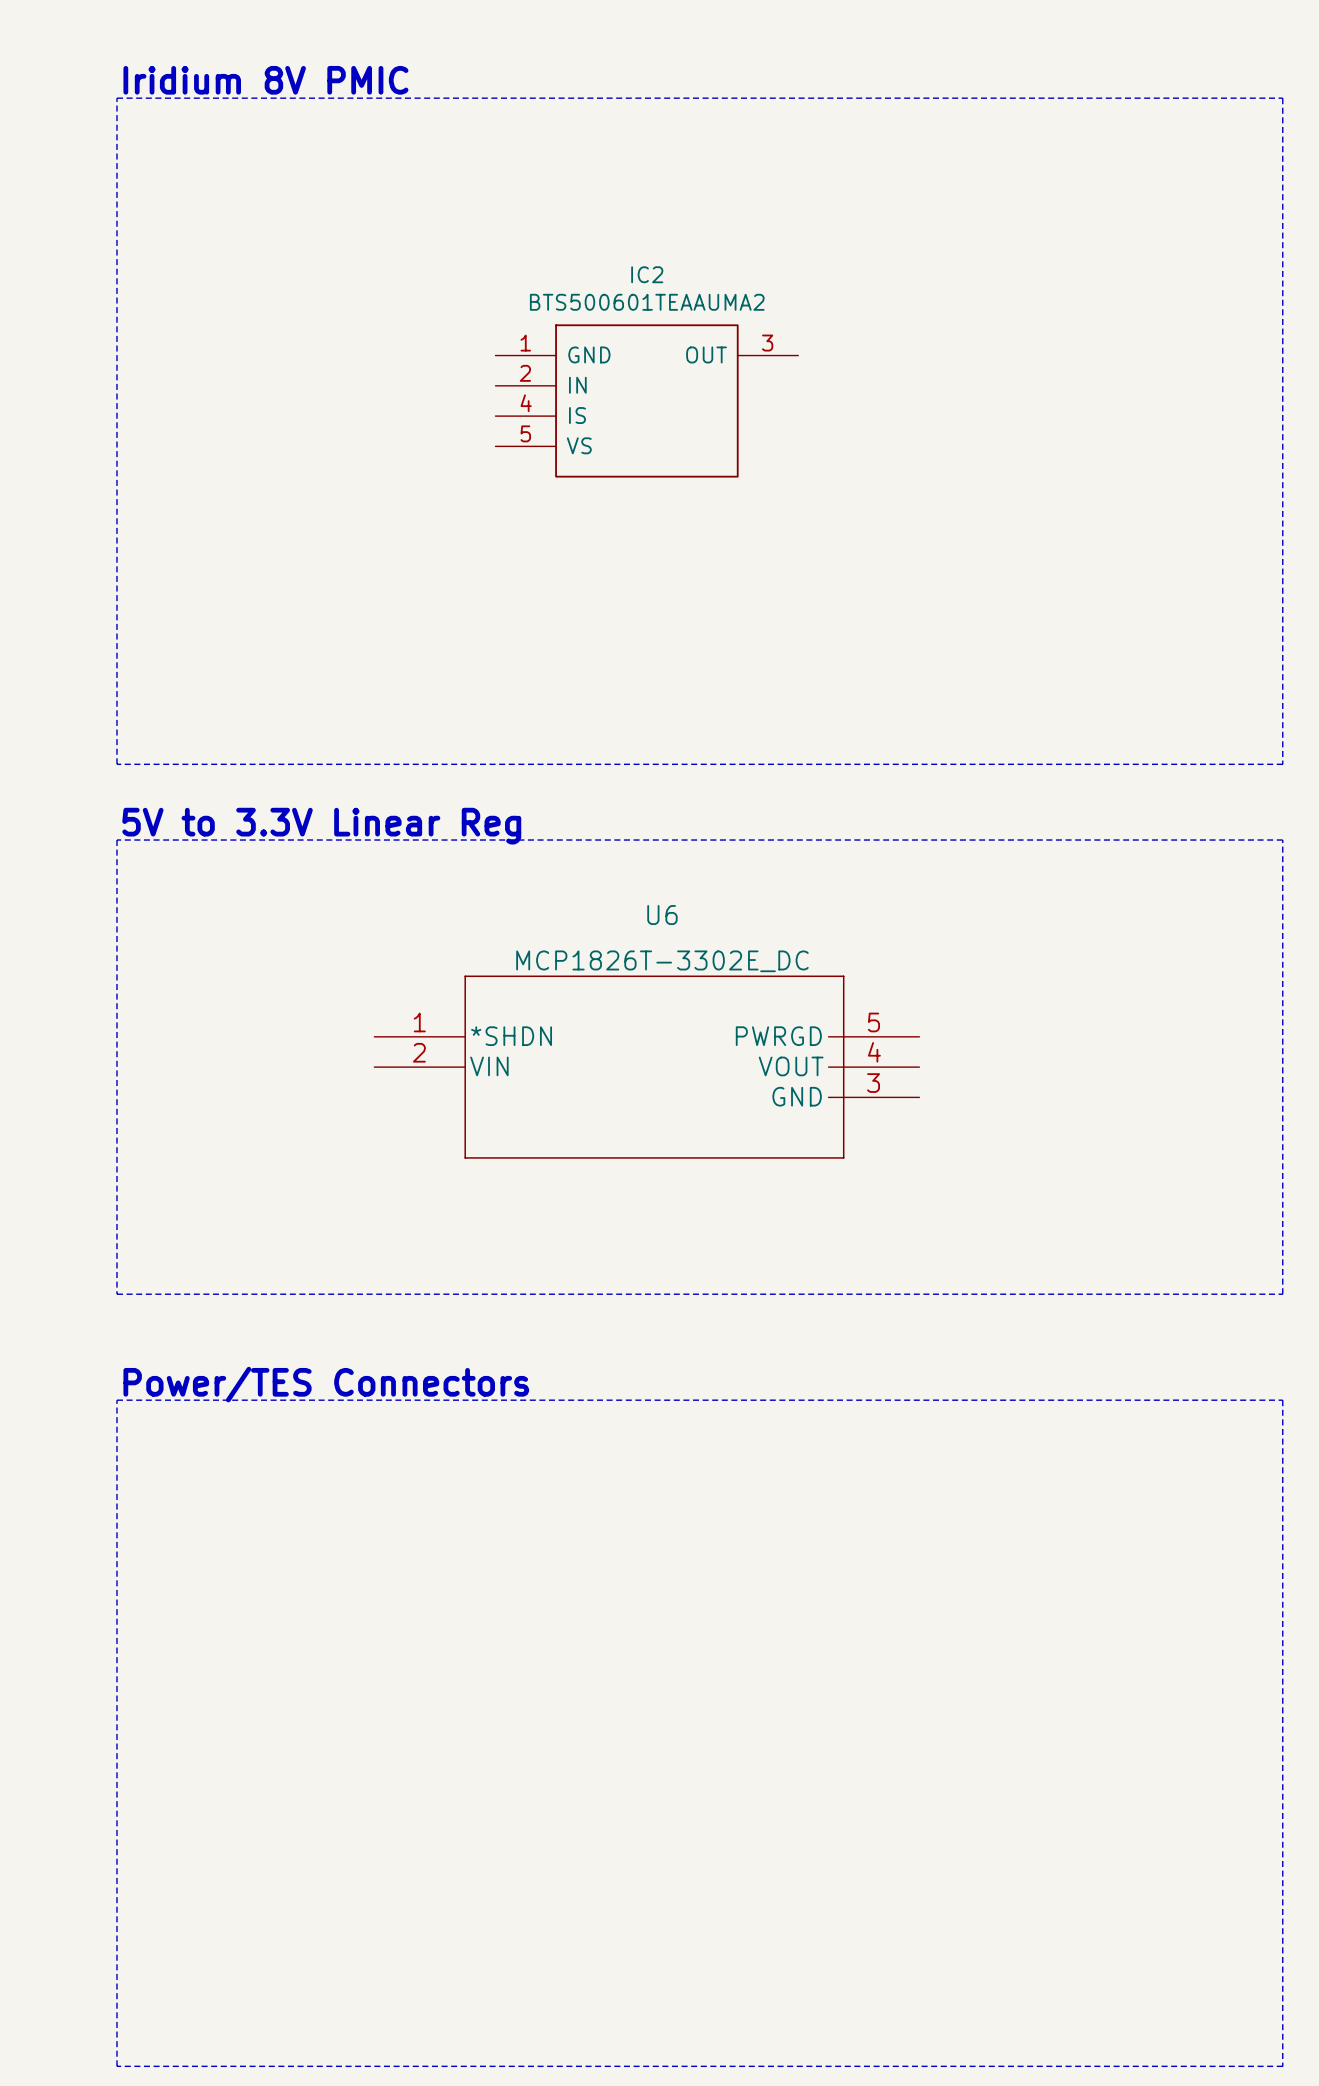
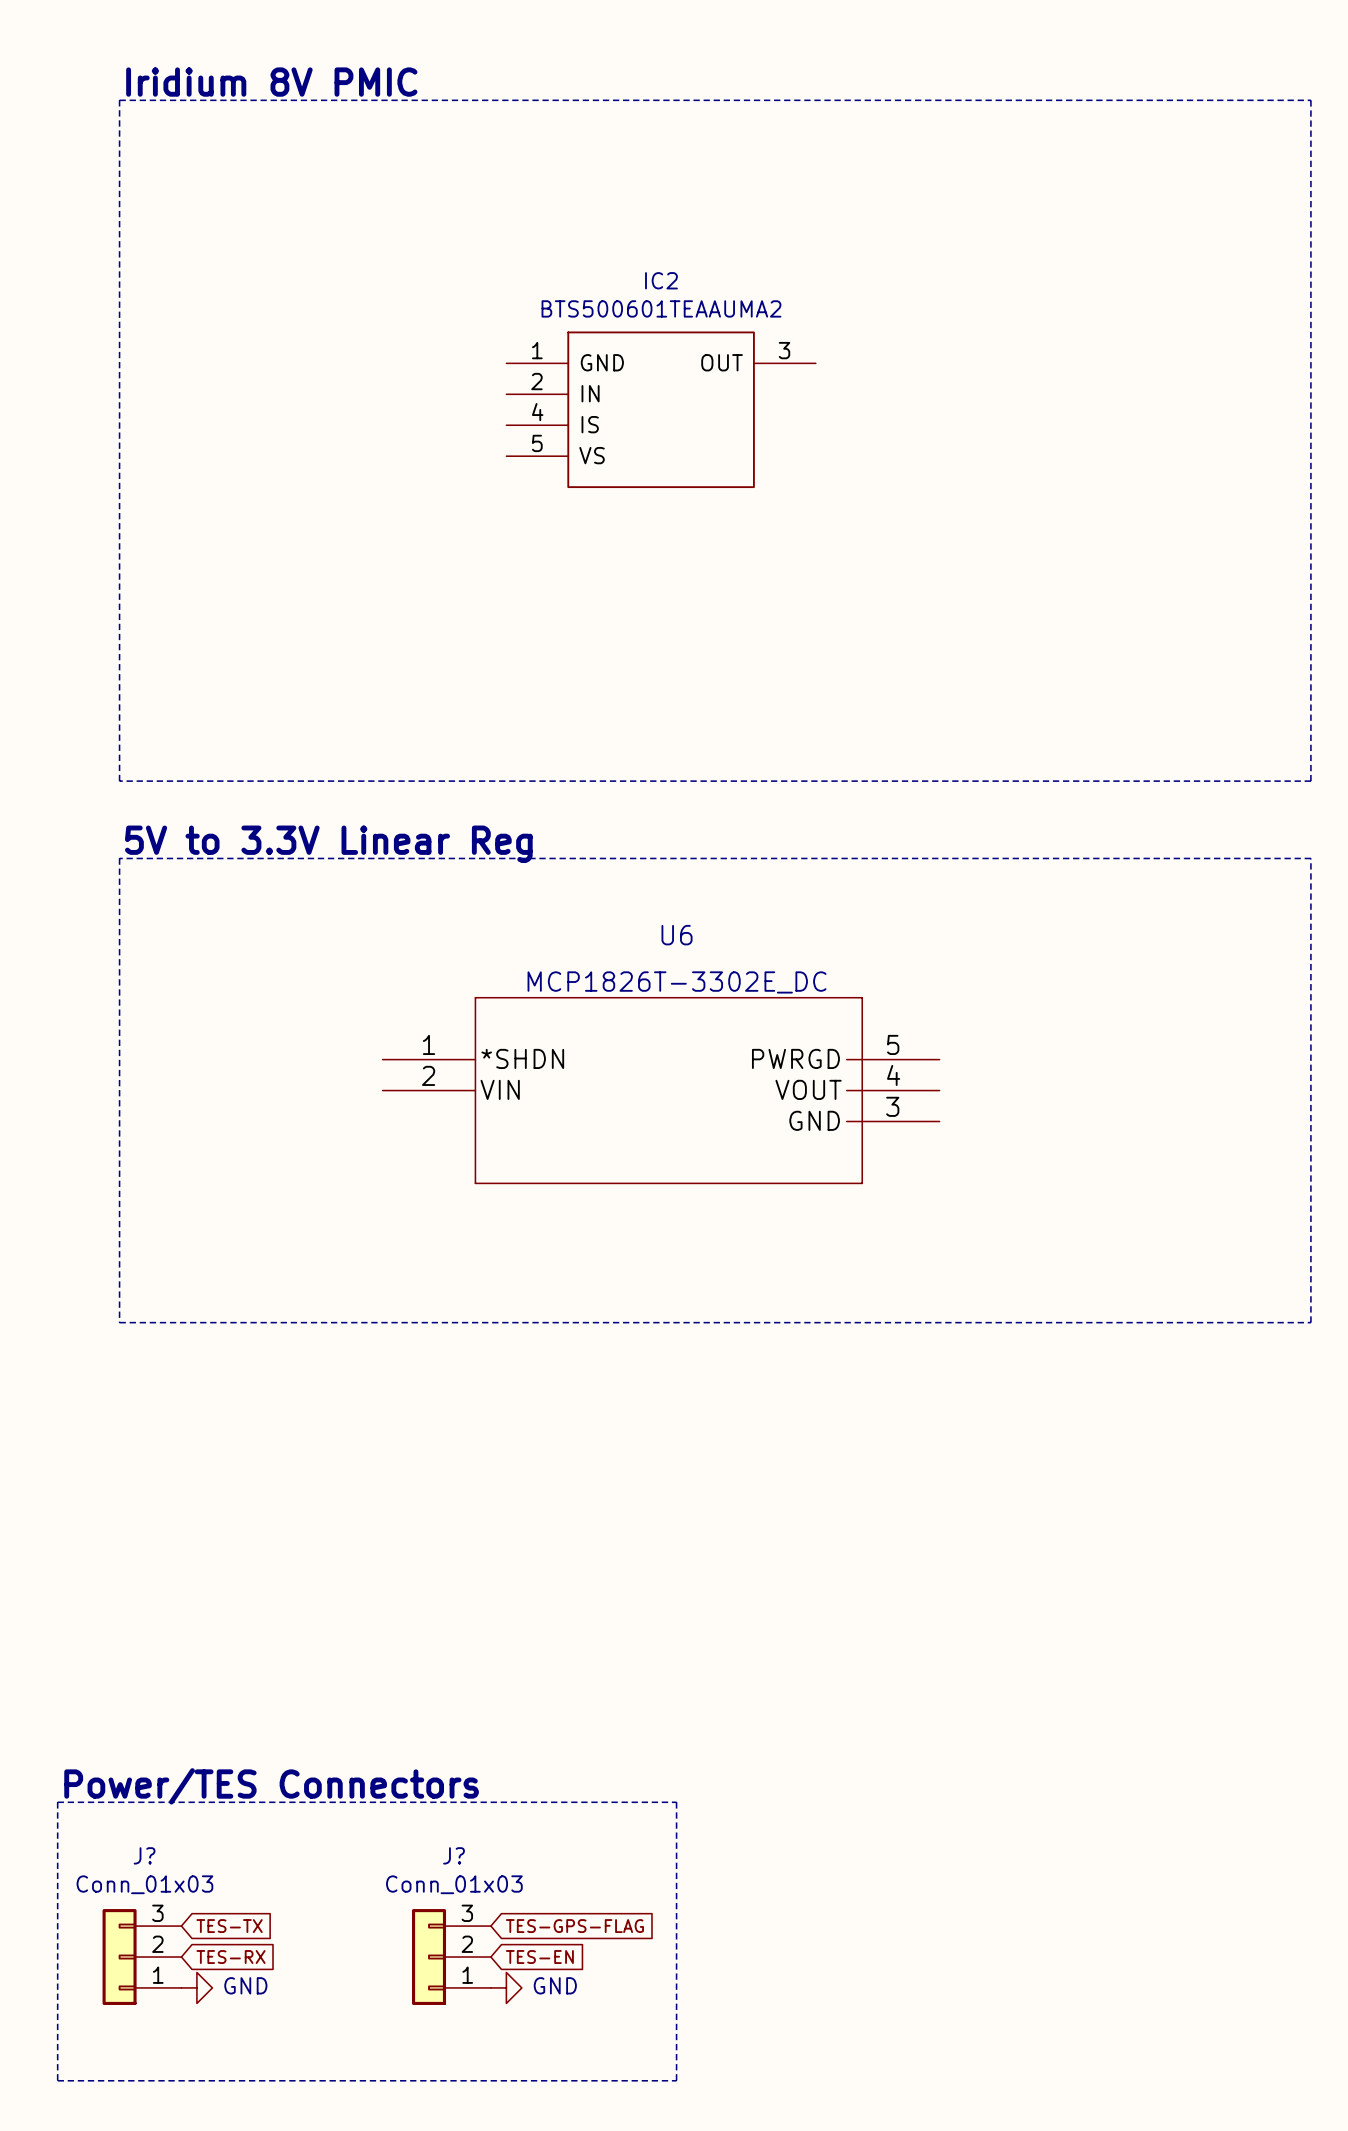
text: Power/TES Connectors (326, 1384) -> none
line: (116, 1400) (1282, 1400) (1282, 2066) (116, 2066) (116, 1400) -> none
text: none -> Power/TES Connectors (271, 1786)
line: none -> (57, 1802) (676, 1802) (676, 2080) (57, 2080) (57, 1802)
global label: none -> TES-TX (229, 1926)
global label: none -> TES-GPS-FLAG (574, 1926)
J?: none -> Conn_01x03 (142, 1957)
global label: none -> TES-RX (231, 1957)
J?: none -> Conn_01x03 (451, 1957)
global label: none -> TES-EN (539, 1957)
power symbol: none -> GND (196, 1987)
power symbol: none -> GND (506, 1987)

